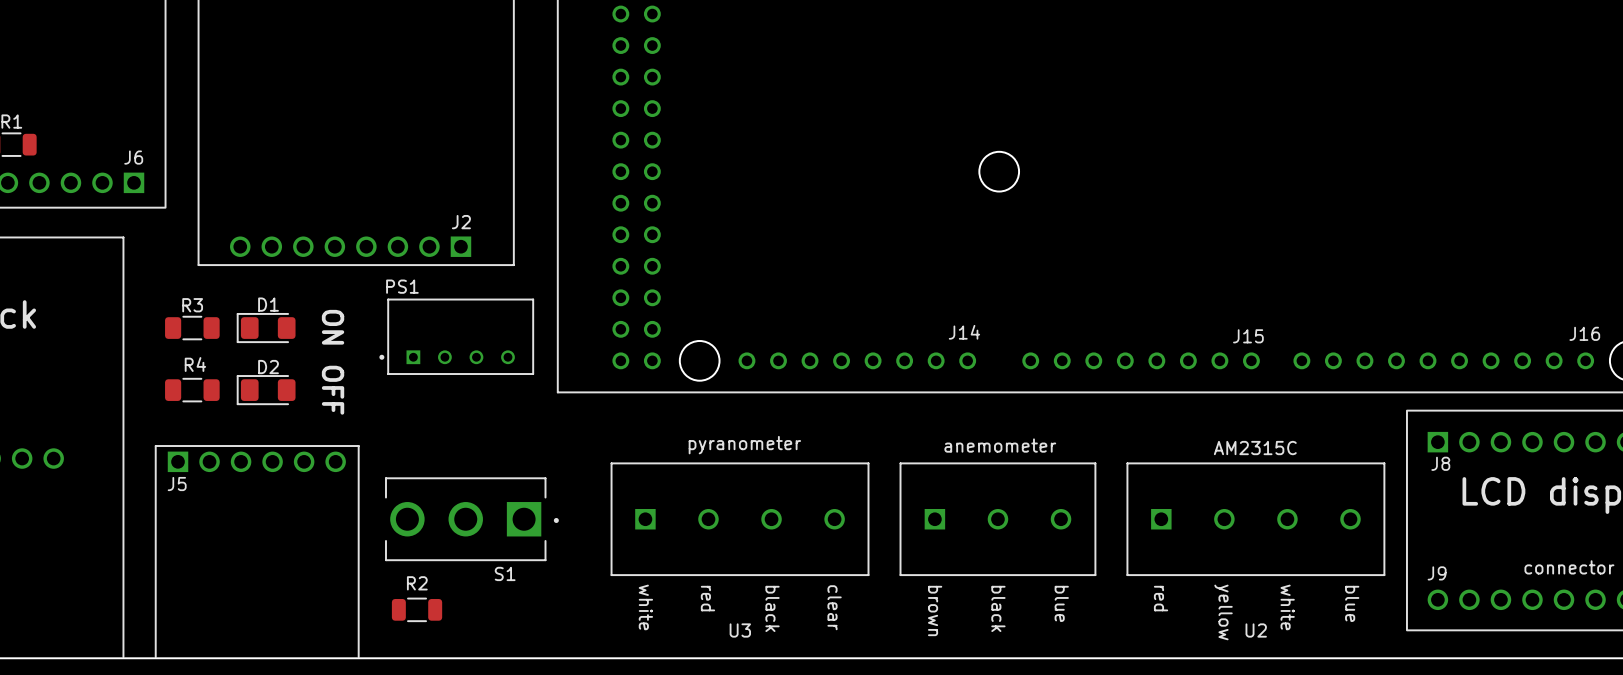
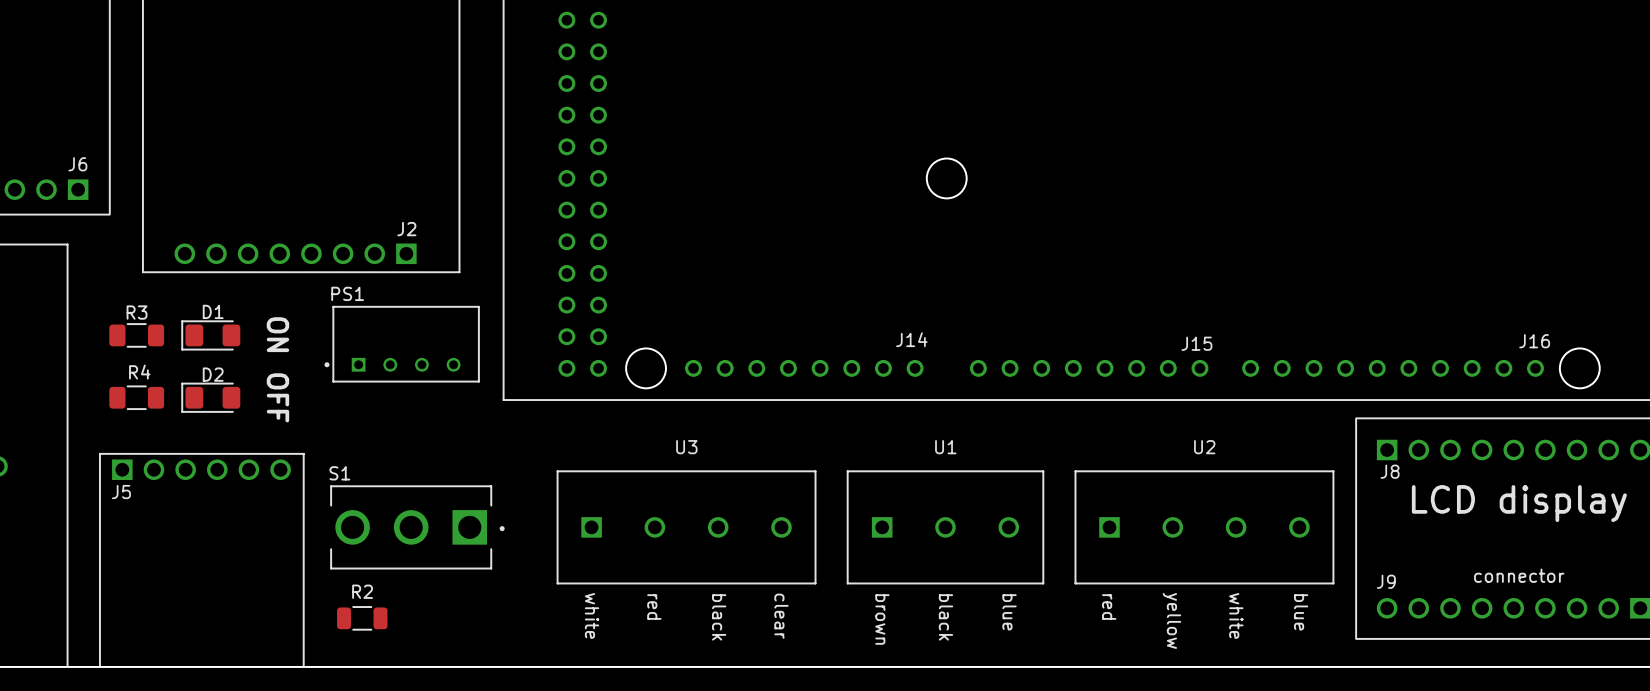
U1 name: none -> U1 (945, 447)
U3 value: pyranometer (744, 445) -> none
U1 value: anemometer (1000, 445) -> none
U2 value: AM2315C (1255, 448) -> none
S1 name position: S1 (505, 573) -> S1 (339, 473)
U3 name position: U3 (740, 630) -> U3 (686, 447)
U2 name position: U2 (1256, 630) -> U2 (1204, 447)

